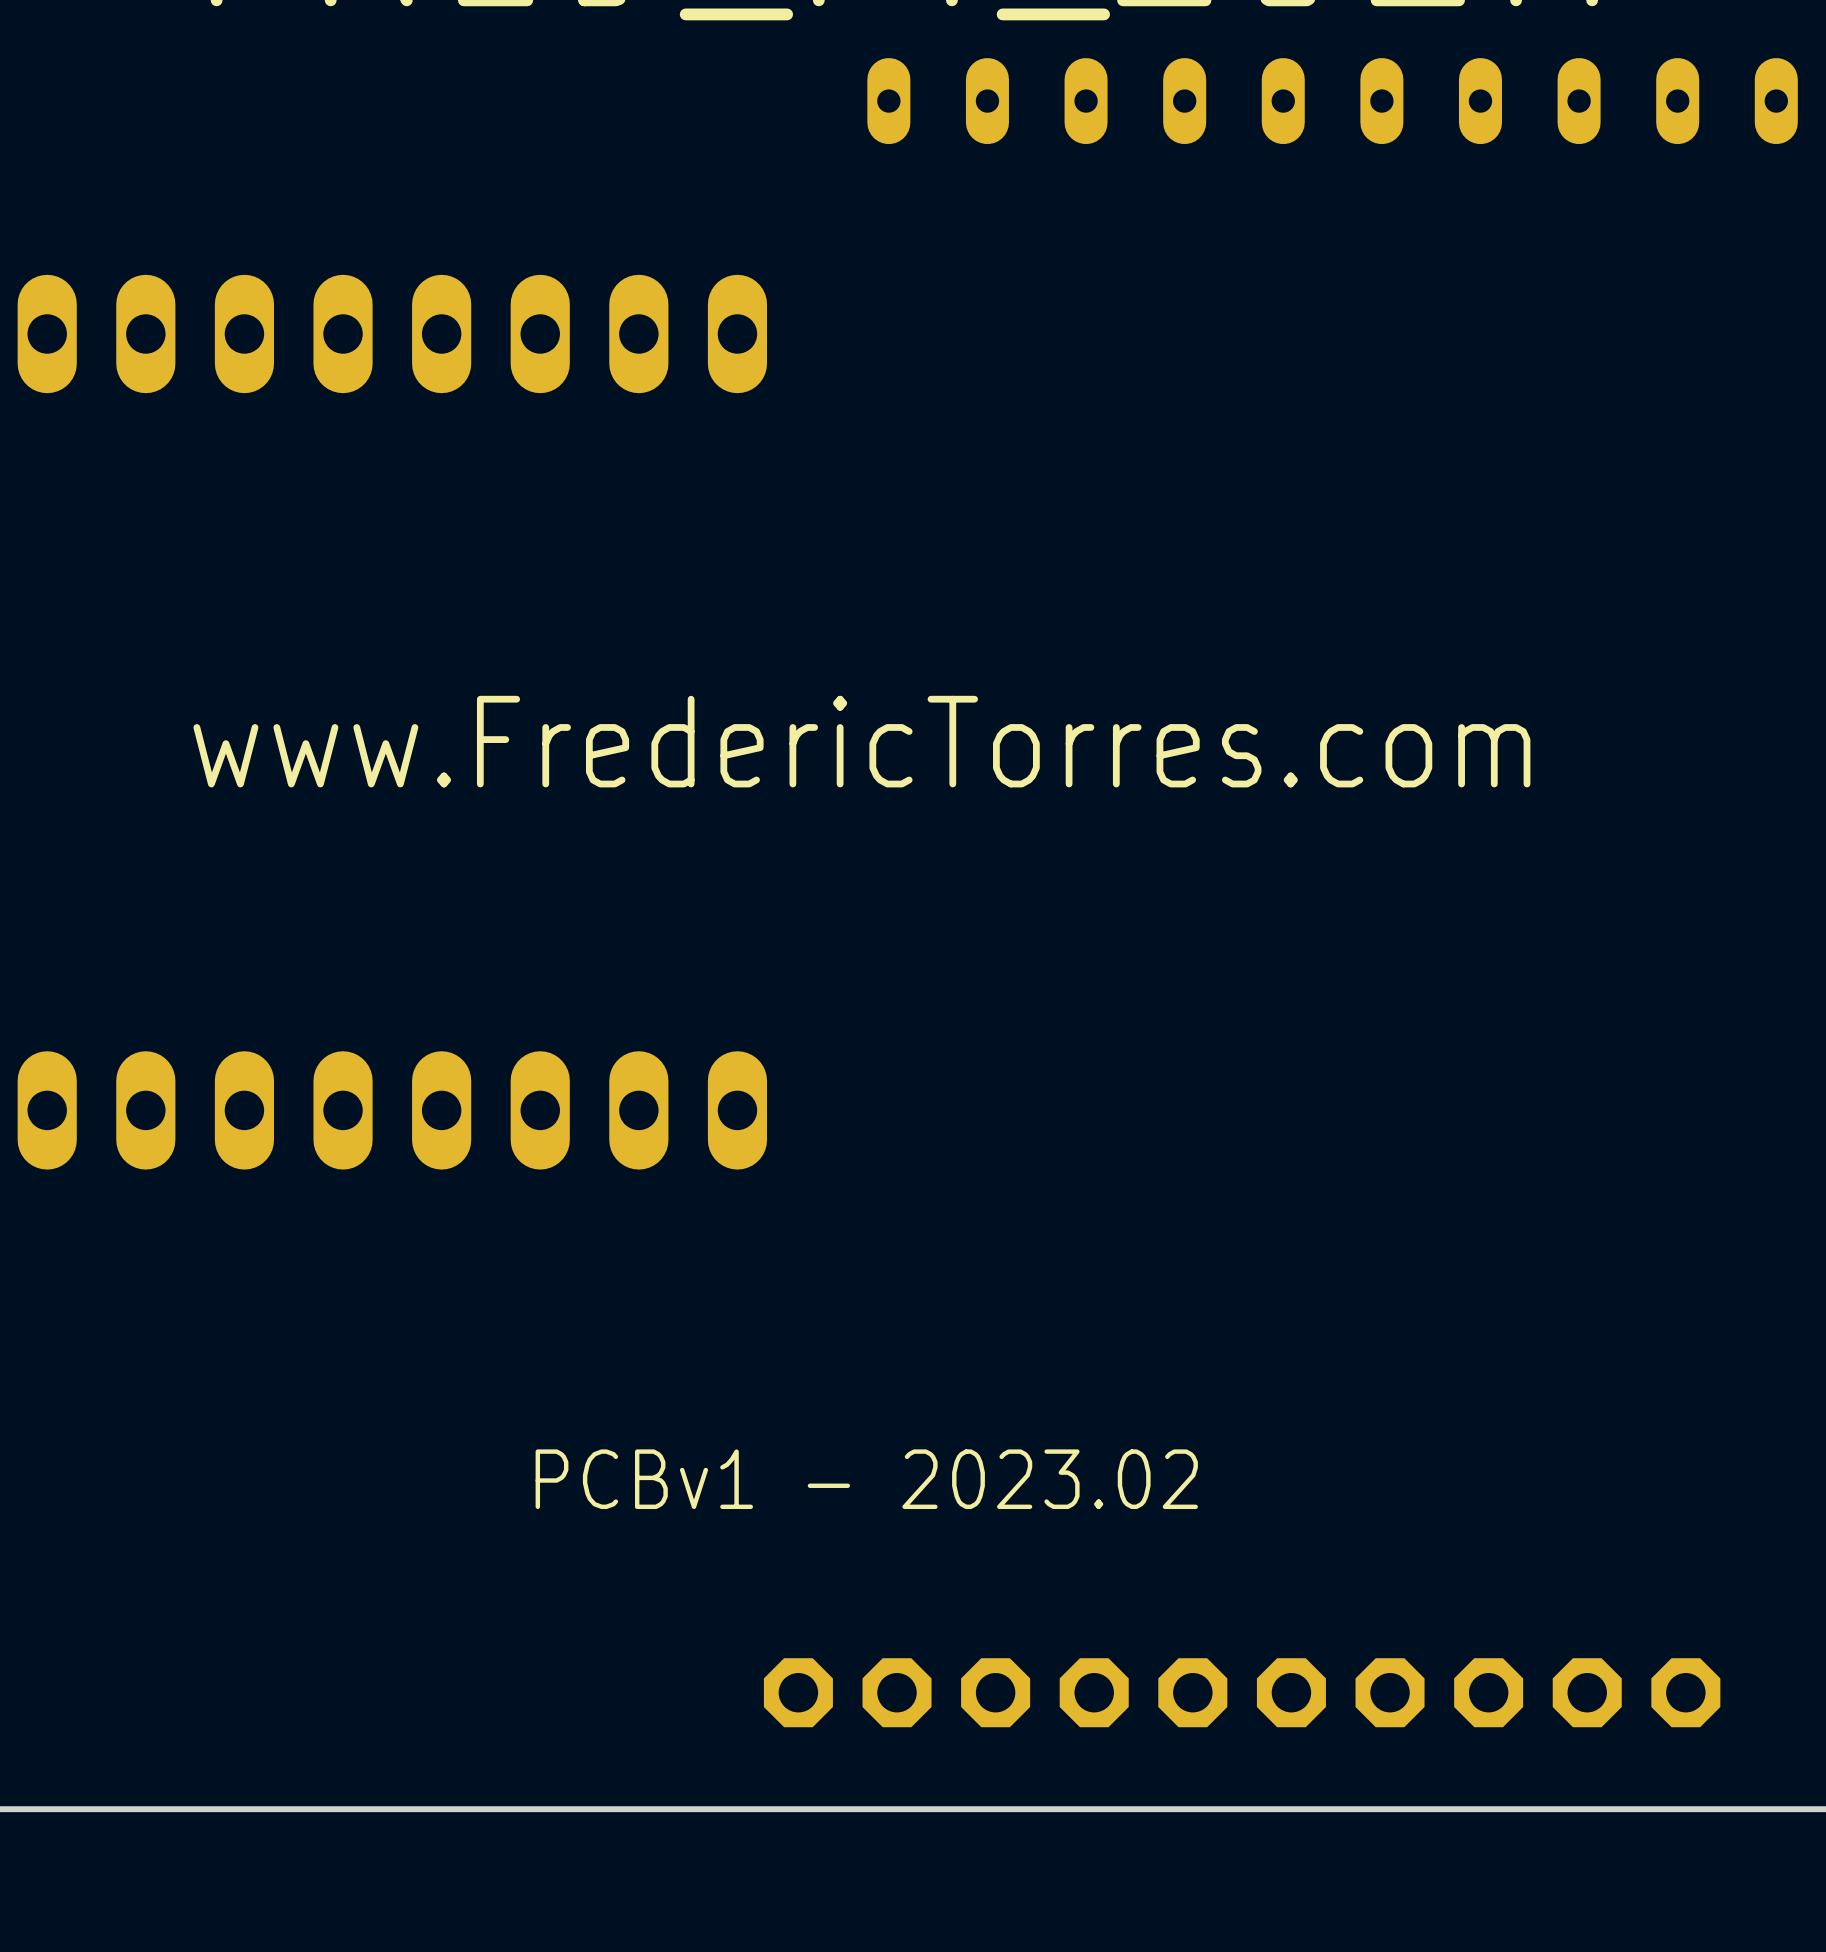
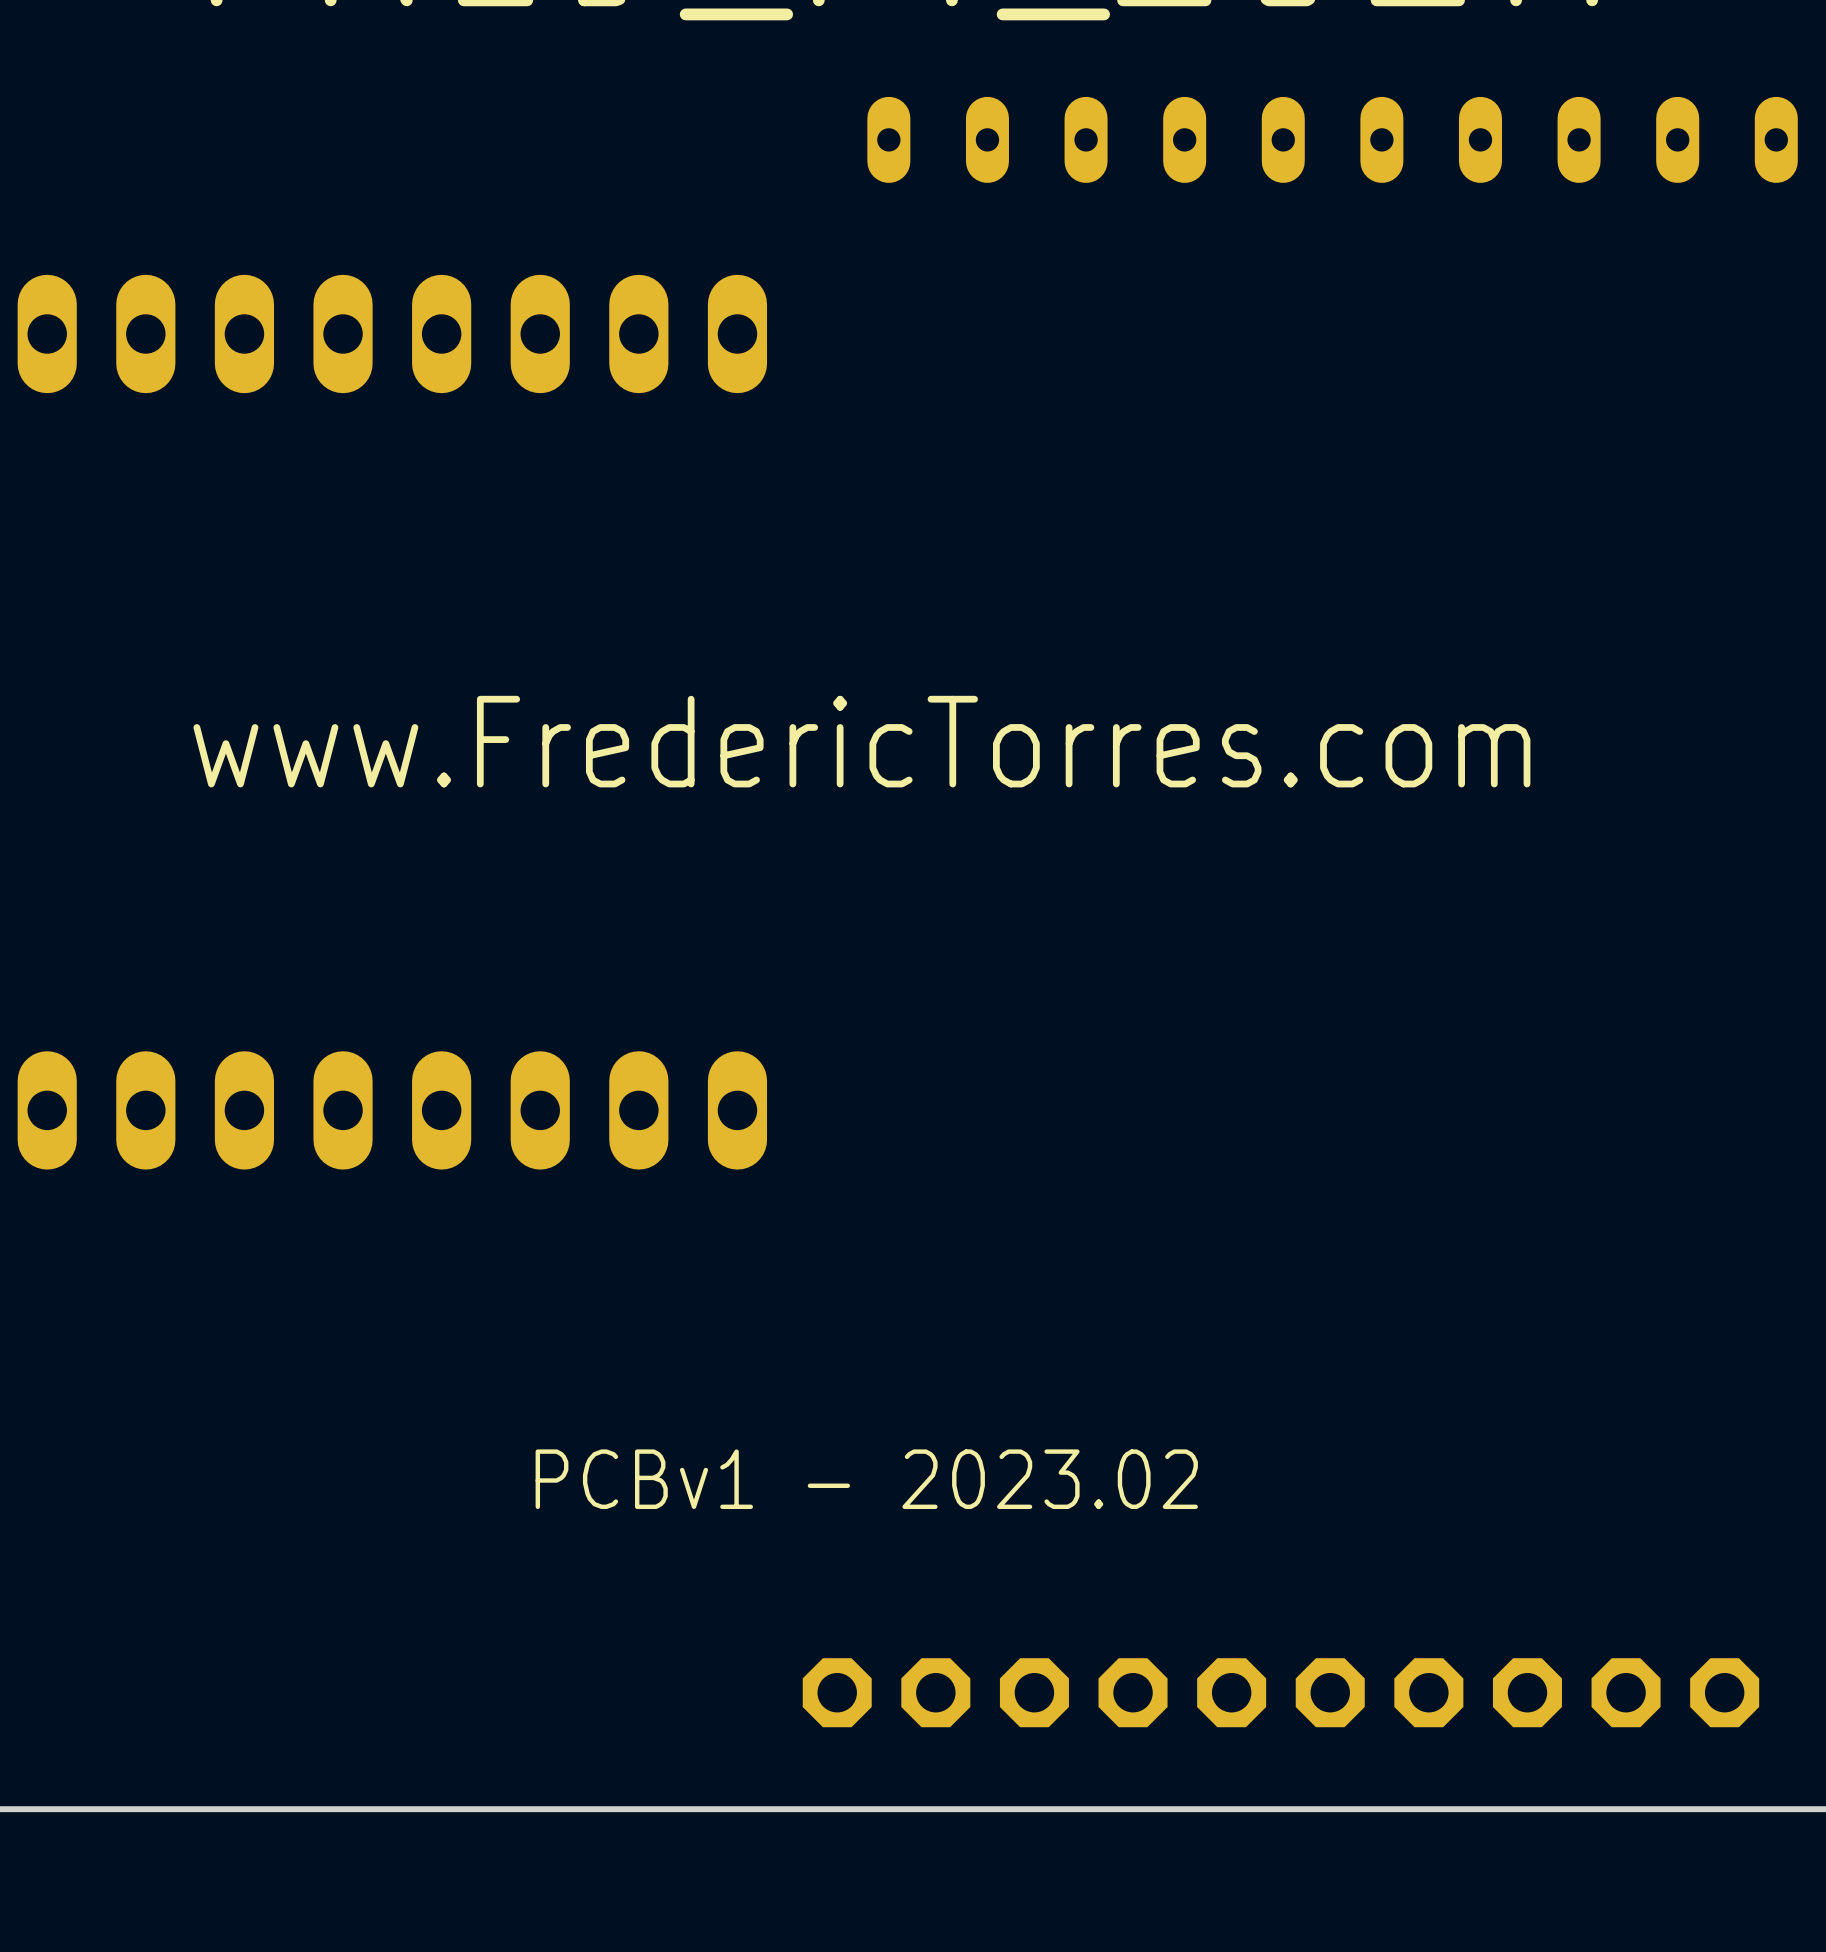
part position: (1332, 101) -> (1332, 139)
part position: (1242, 1692) -> (1280, 1692)

